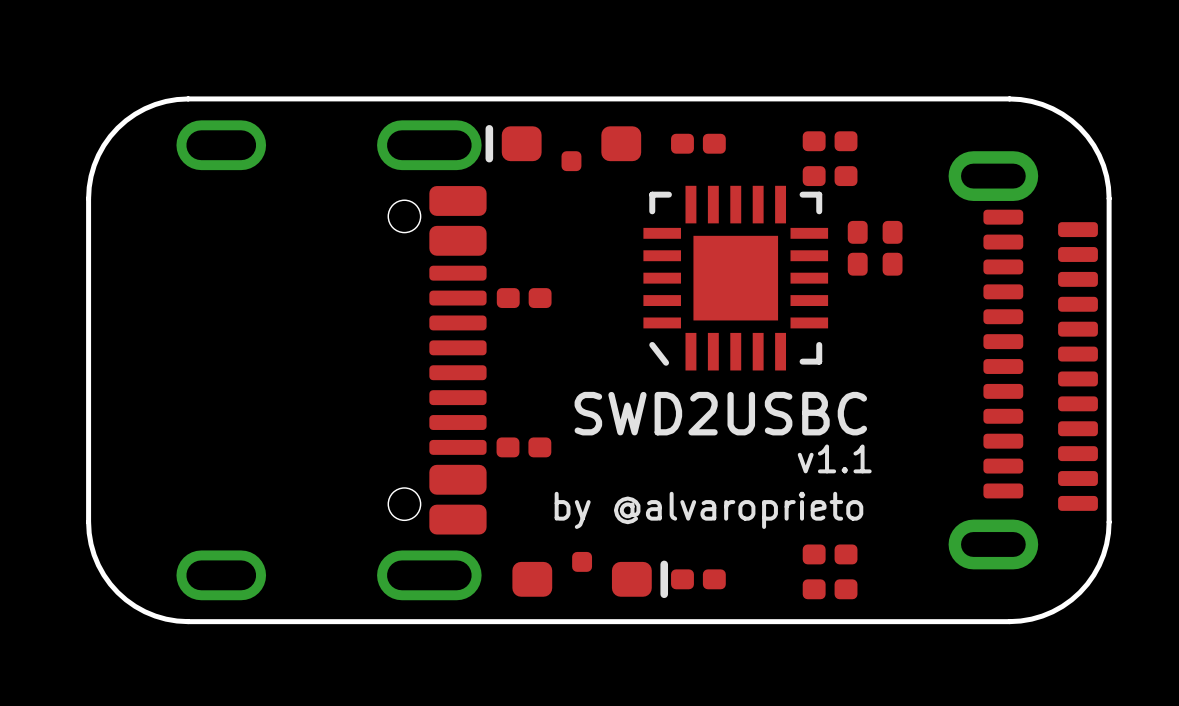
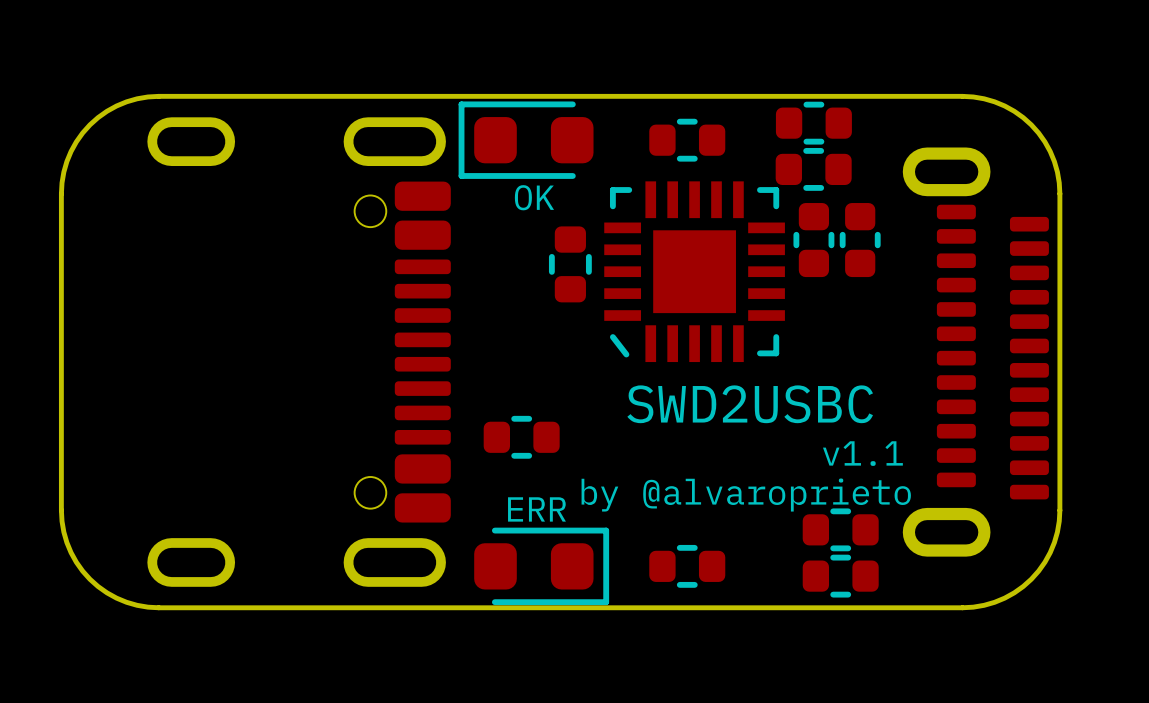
part footprint: [485, 125, 642, 172] -> [458, 101, 594, 179]
part: none -> (813, 123)
part footprint: [671, 133, 726, 154] -> [649, 118, 726, 162]
part: (830, 141) -> none
part: none -> (813, 169)
part: (830, 176) -> none
text: none -> OK (534, 197)
part footprint: [847, 220, 868, 276] -> [793, 203, 835, 278]
part footprint: [882, 220, 903, 276] -> [839, 203, 881, 278]
part: none -> (570, 264)
part: (524, 298) -> none
text position: SWD2USBC (720, 413) -> SWD2USBC (750, 404)
part footprint: [496, 437, 552, 458] -> [483, 415, 560, 459]
text position: v1.1 (834, 458) -> v1.1 (862, 453)
text position: by @alvaroprieto (708, 510) -> by @alvaroprieto (746, 495)
text: none -> ERR (536, 509)
part: none -> (840, 529)
part footprint: [512, 551, 669, 599] -> [474, 527, 610, 606]
part: (830, 554) -> none
part footprint: [671, 569, 726, 590] -> [649, 544, 726, 588]
part: (830, 589) -> none
part: none -> (840, 576)

